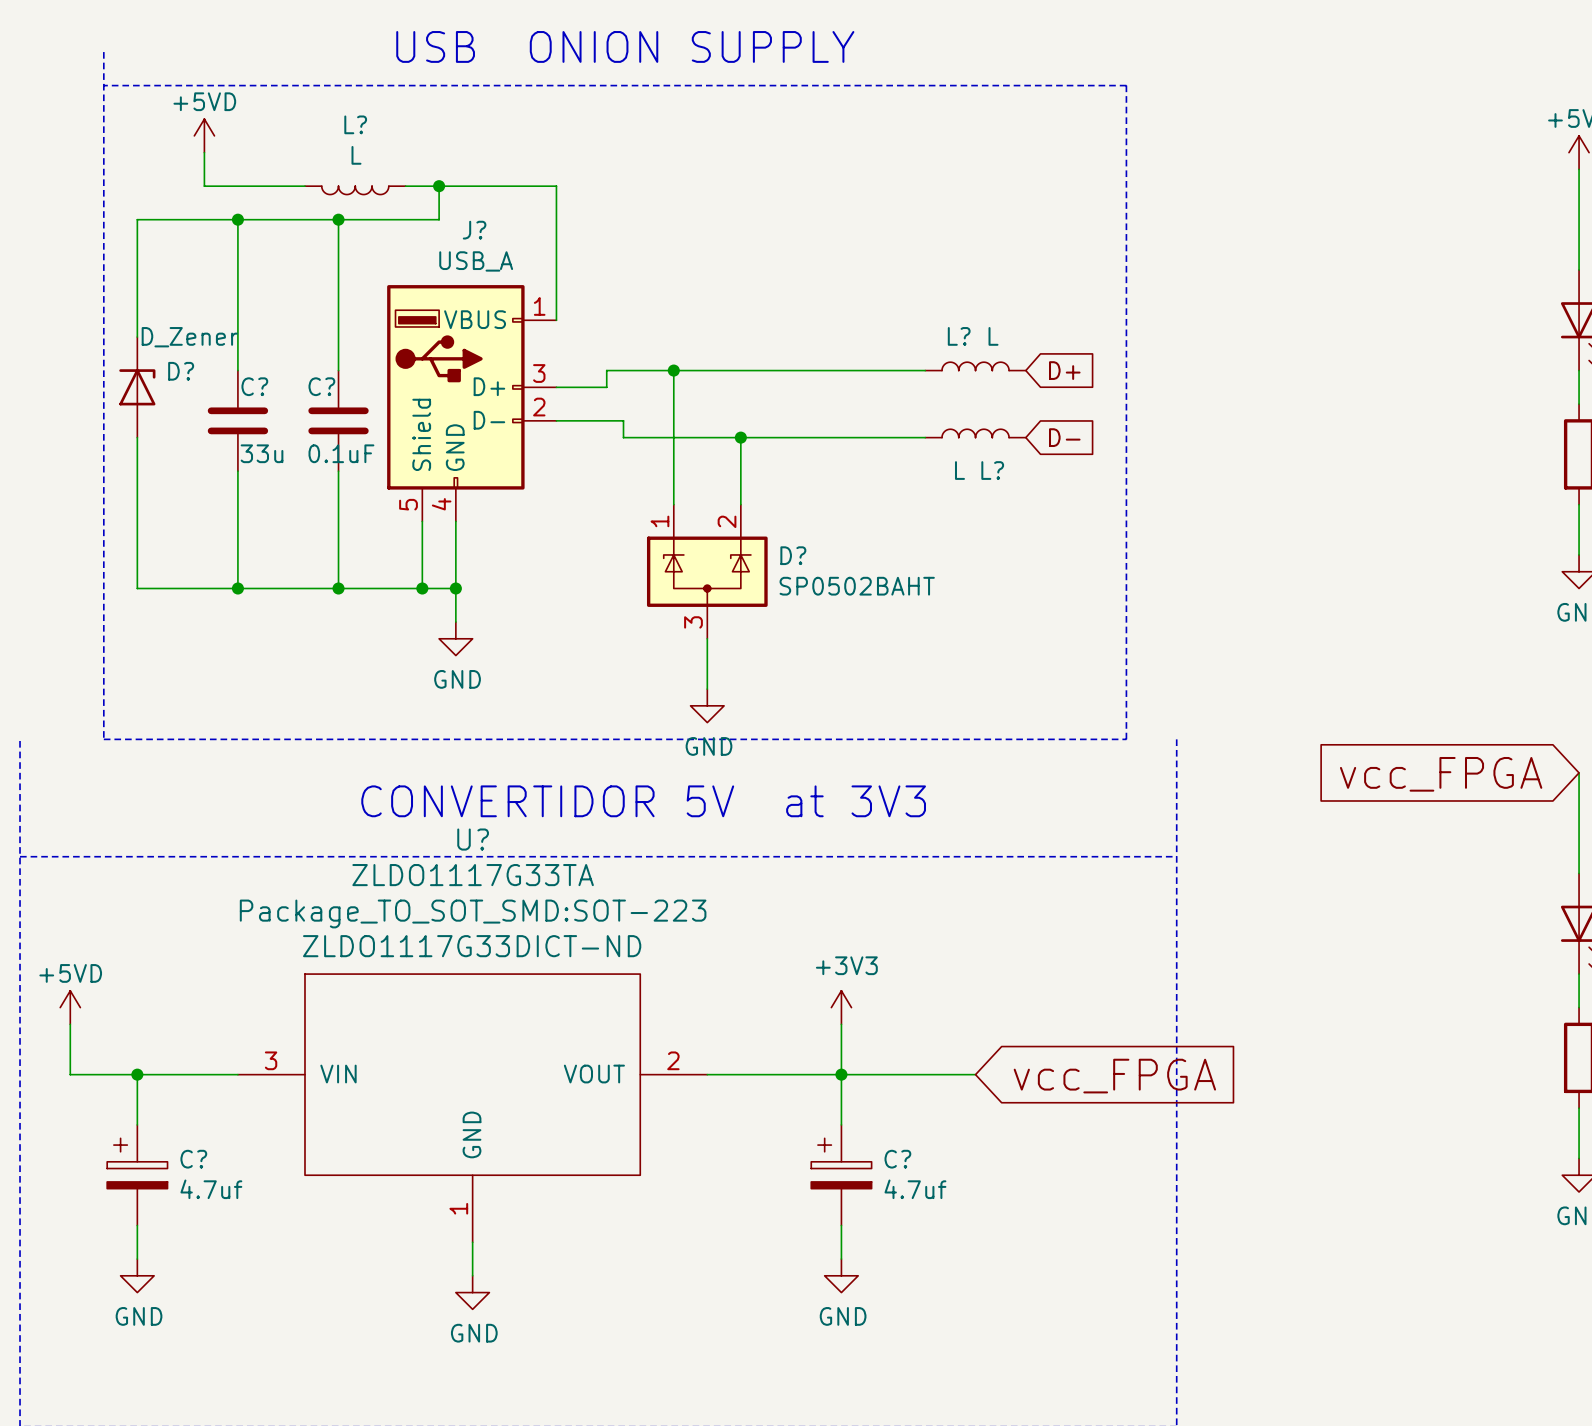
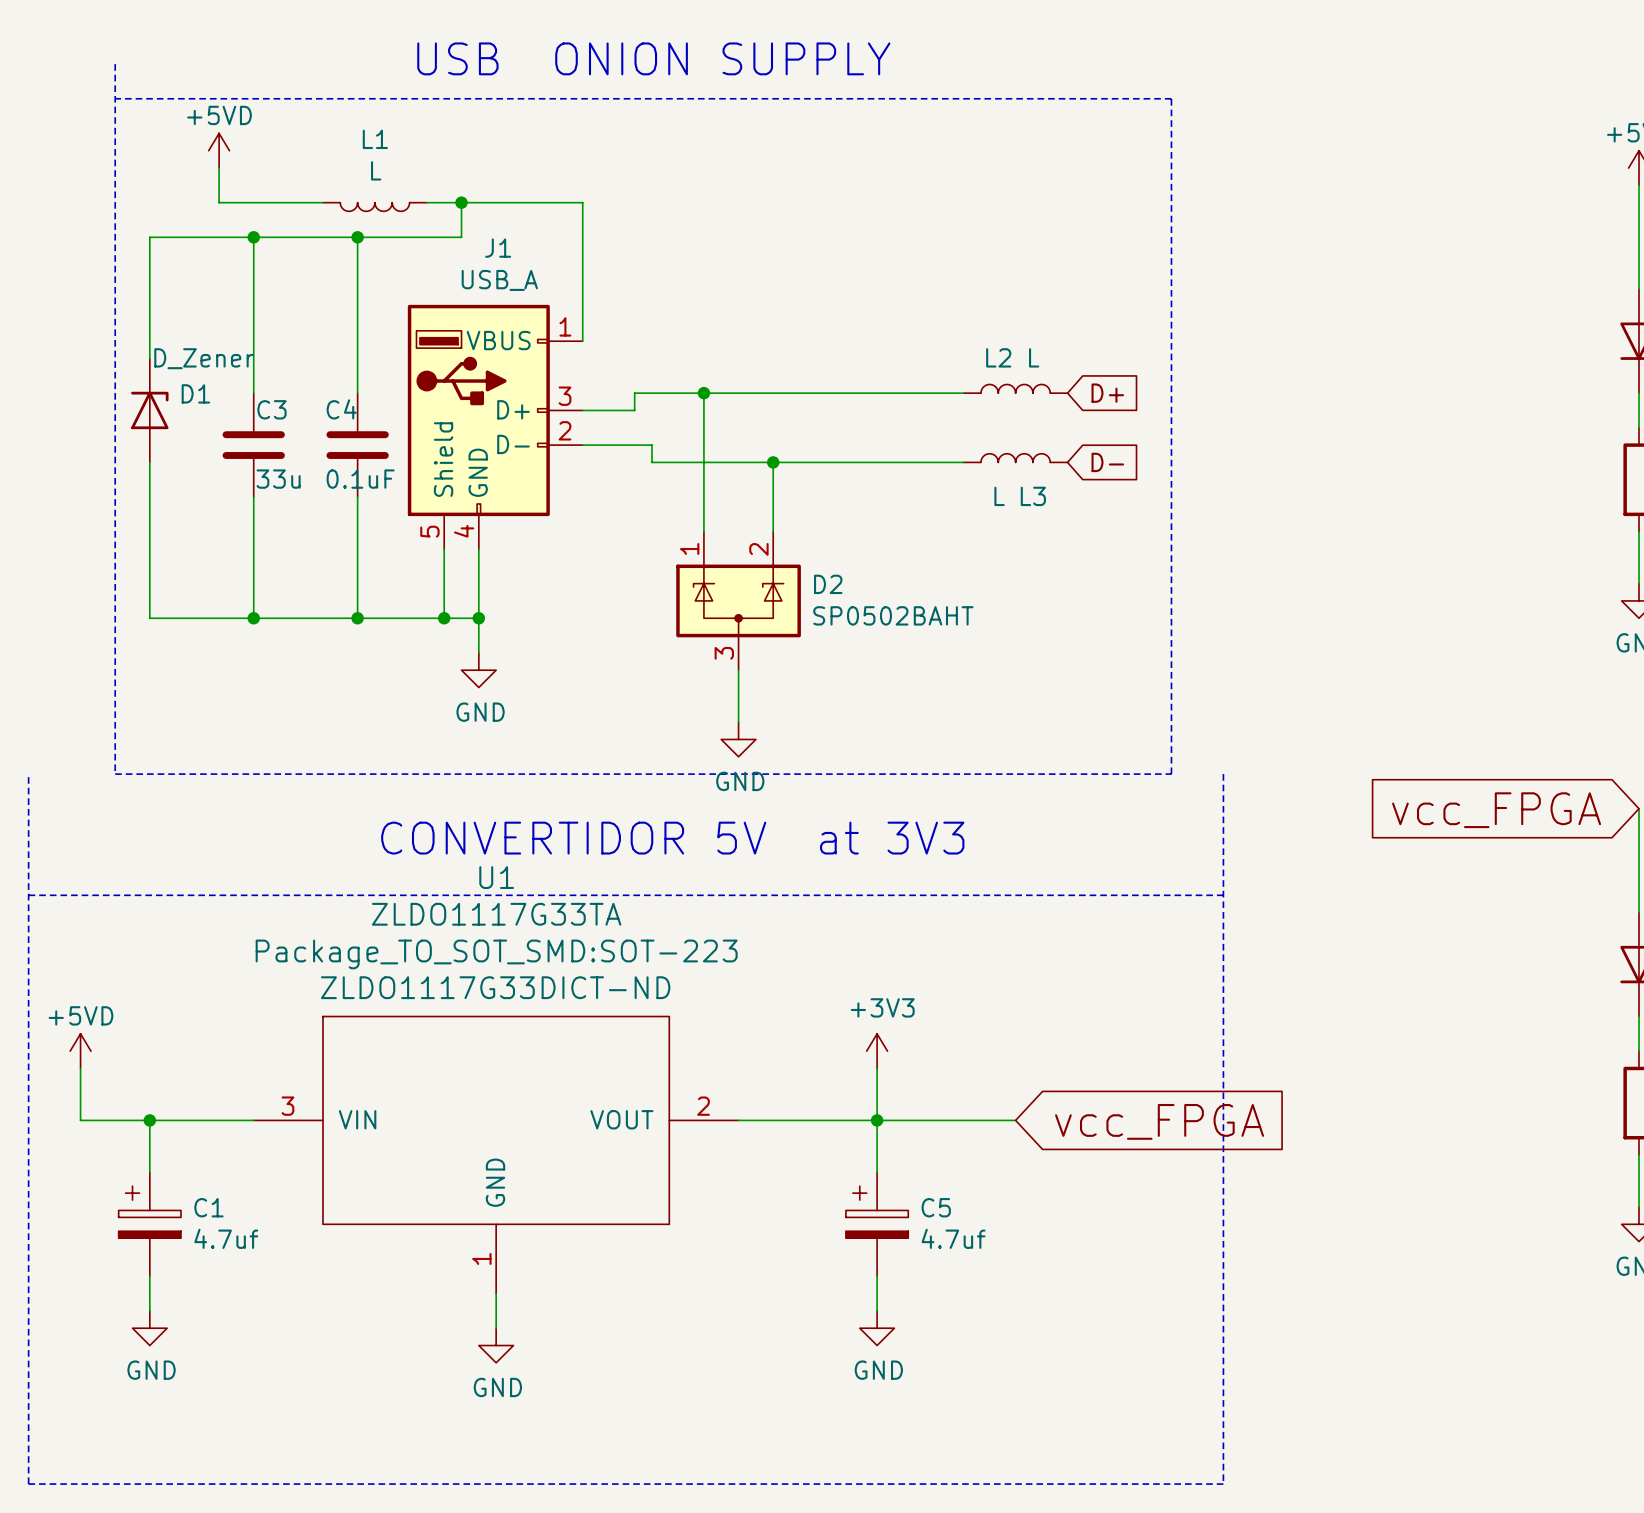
L? name: L? (355, 124) -> L1 (375, 139)
J? name: J? (474, 230) -> J1 (498, 248)
L? name: L? (959, 336) -> L2 (998, 357)
D? name: D? (181, 371) -> D1 (195, 393)
C? name: C? (254, 386) -> C3 (271, 409)
C? name: C? (321, 386) -> C4 (341, 409)
L? name: L? (992, 470) -> L3 (1033, 496)
D? name: D? (793, 555) -> D2 (828, 584)
U? name: U? (473, 839) -> U1 (496, 877)
C? name: C? (193, 1159) -> C1 (208, 1207)
C? name: C? (897, 1159) -> C5 (936, 1207)

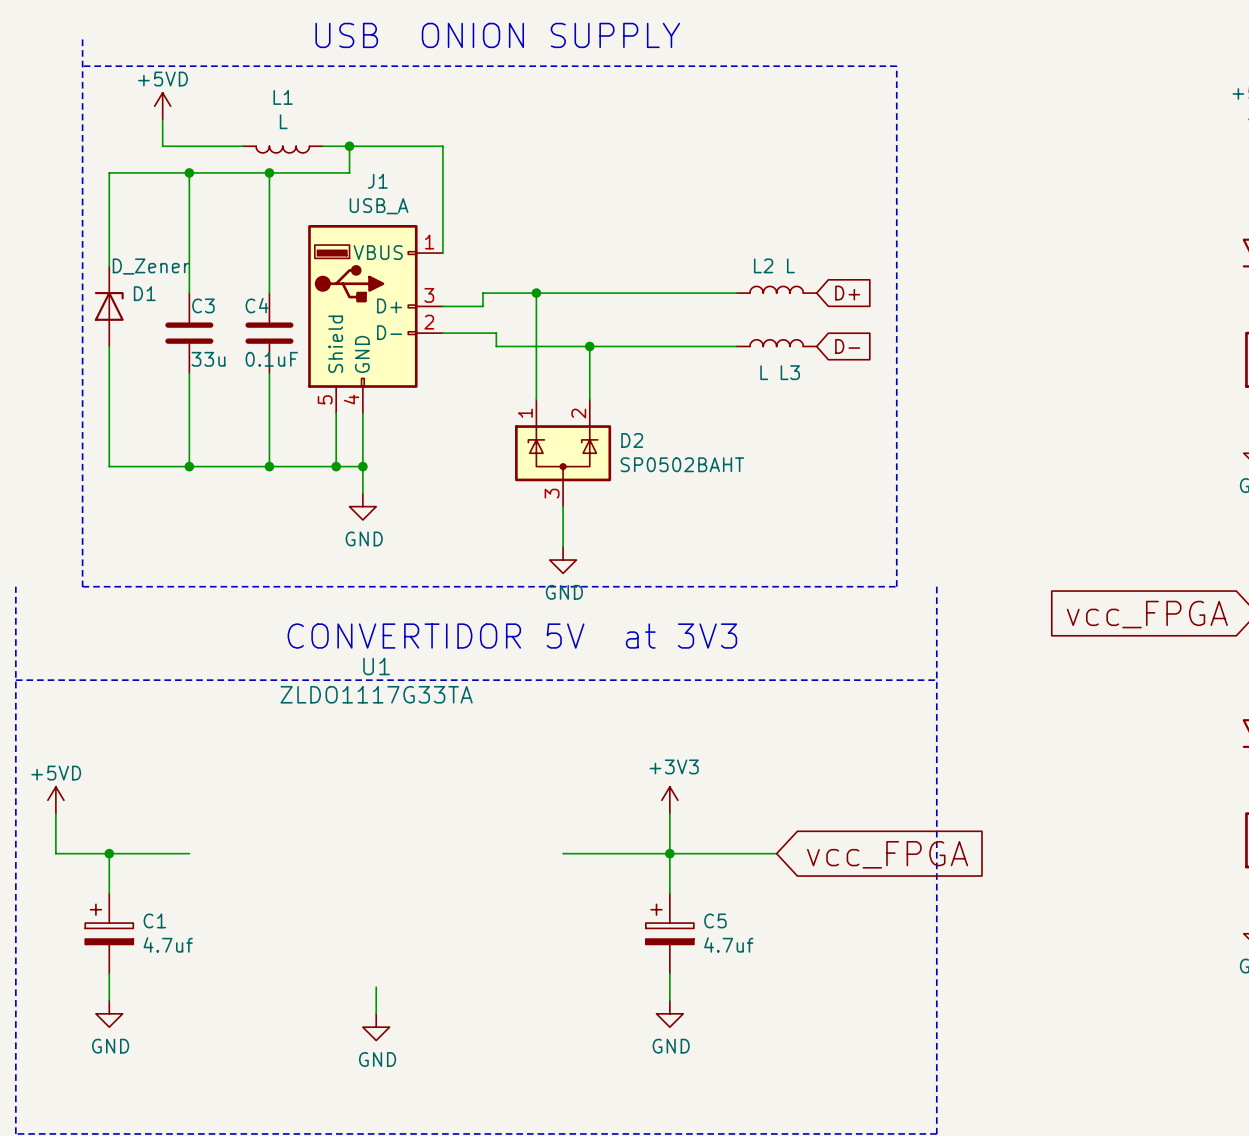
U1 text: Package_TO_SOT_SMD:SOT-223 (496, 954) -> none
U1 text: ZLDO1117G33DICT-ND (495, 987) -> none
U1 symbol: [253, 1016, 739, 1294] -> [280, 657, 473, 704]

